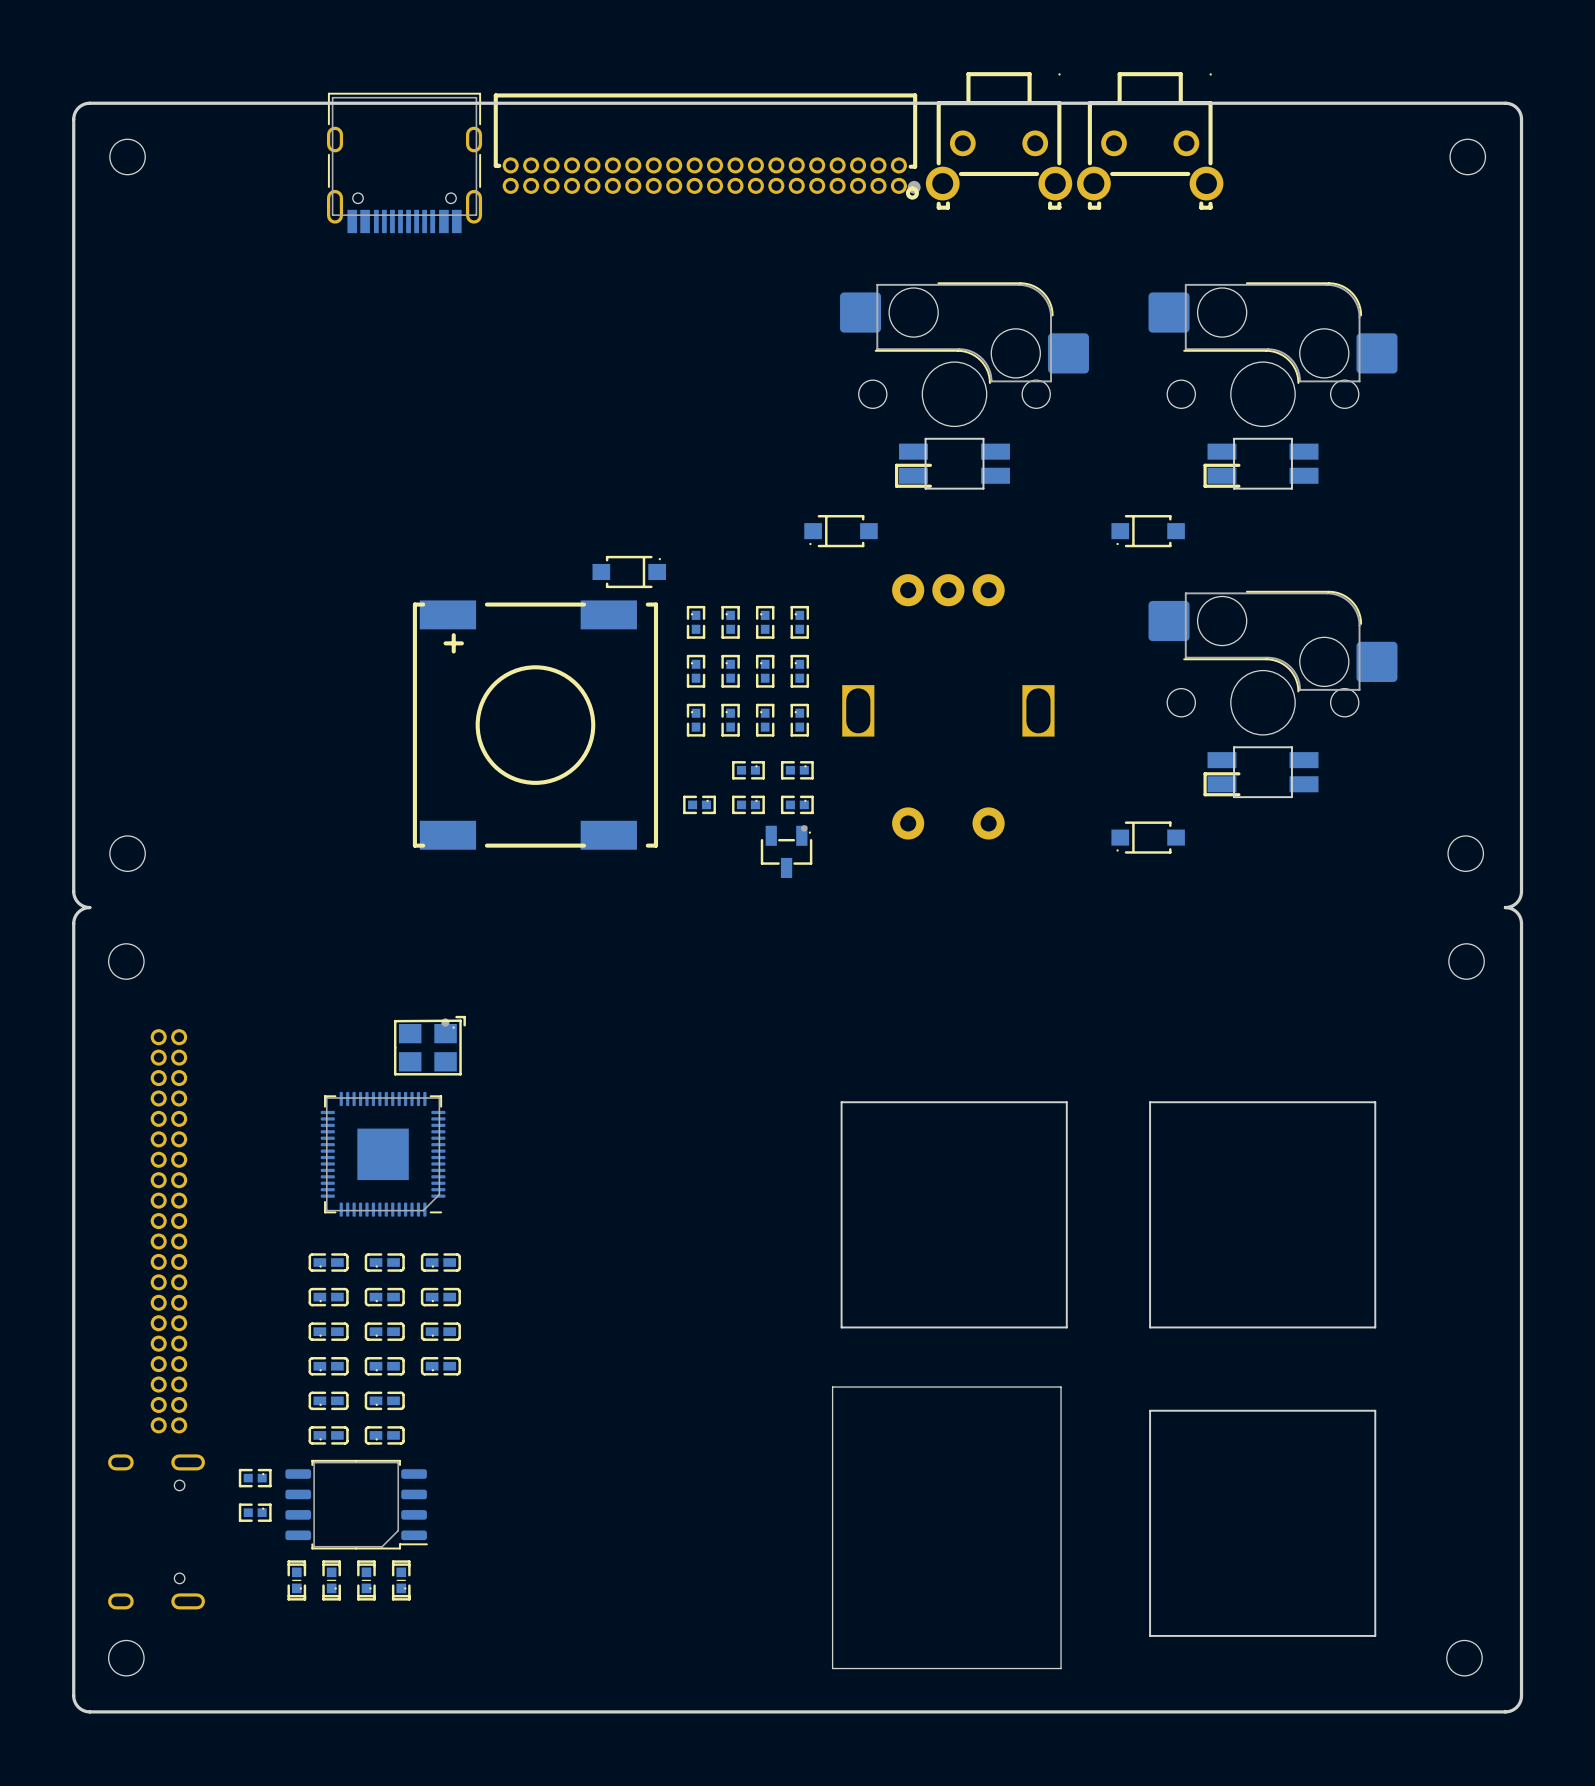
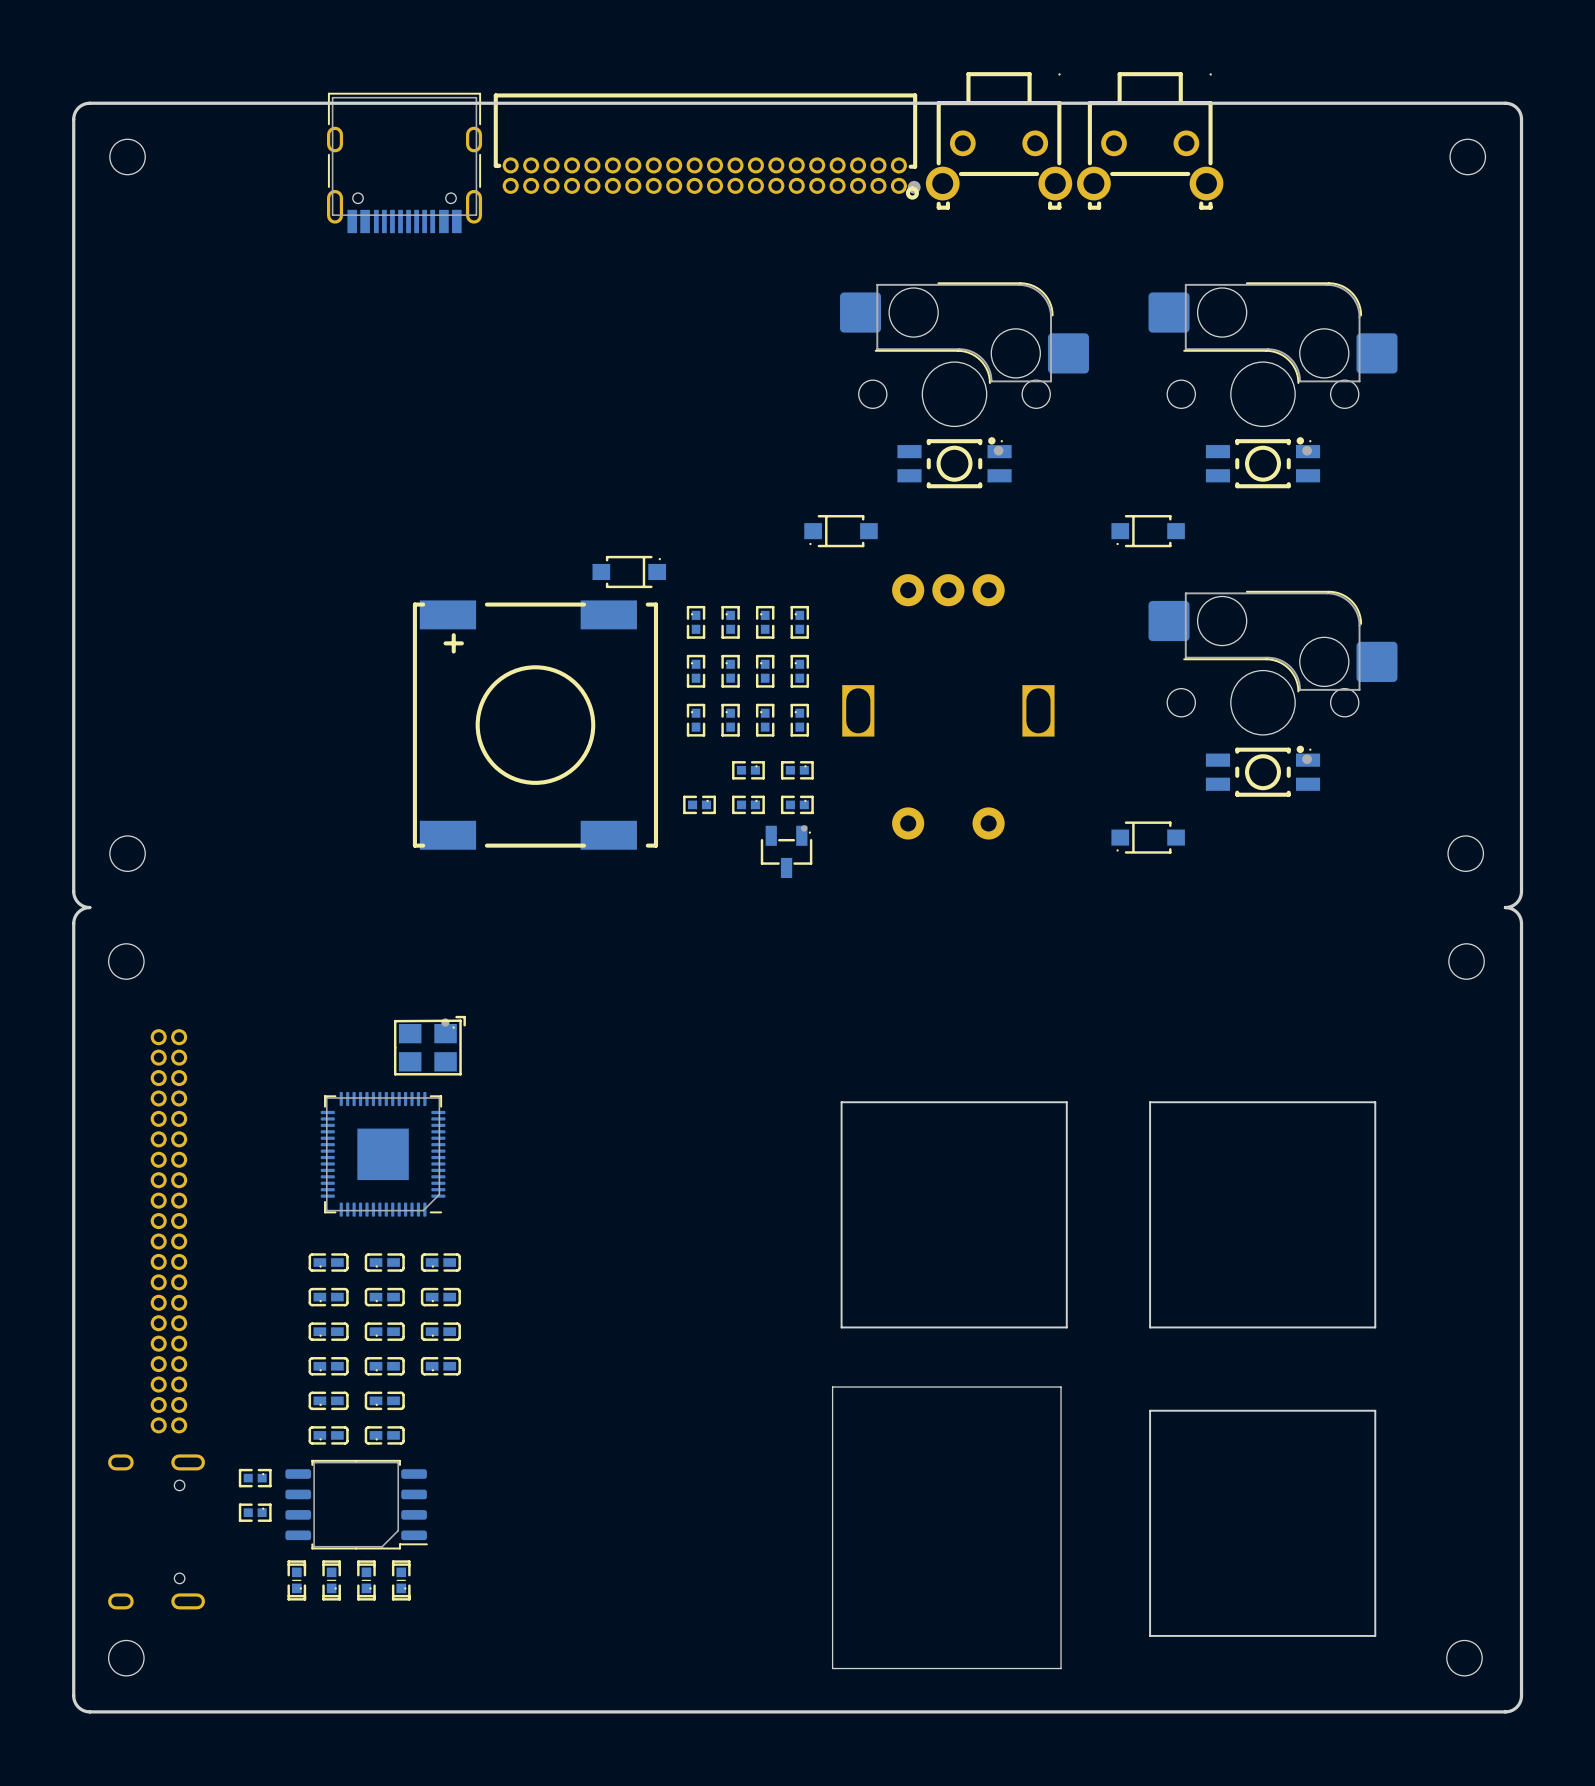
part footprint: [894, 437, 1011, 490] -> [897, 437, 1012, 489]
part footprint: [1203, 437, 1319, 490] -> [1205, 437, 1321, 489]
part footprint: [1203, 746, 1319, 799] -> [1205, 745, 1321, 797]

